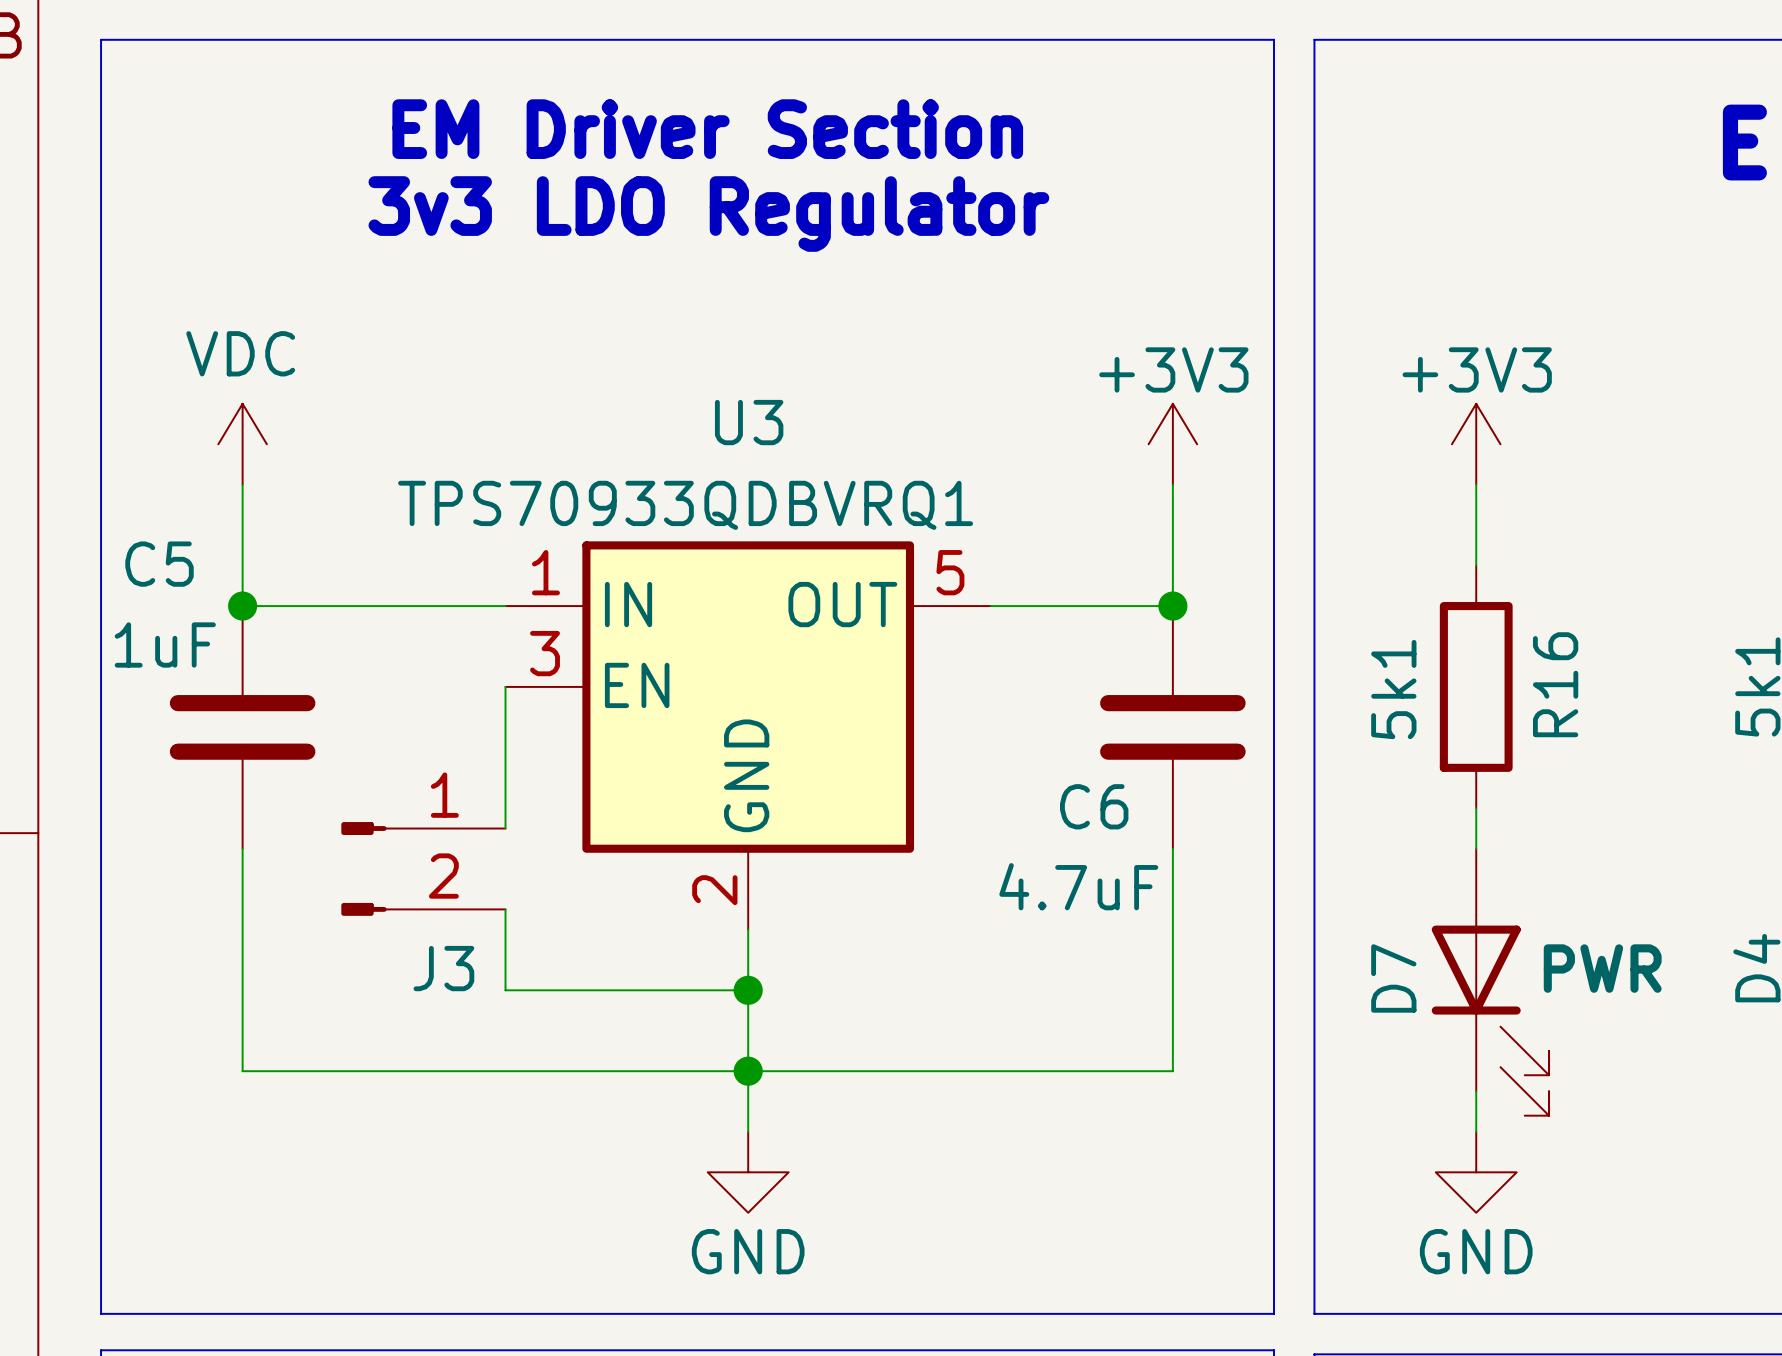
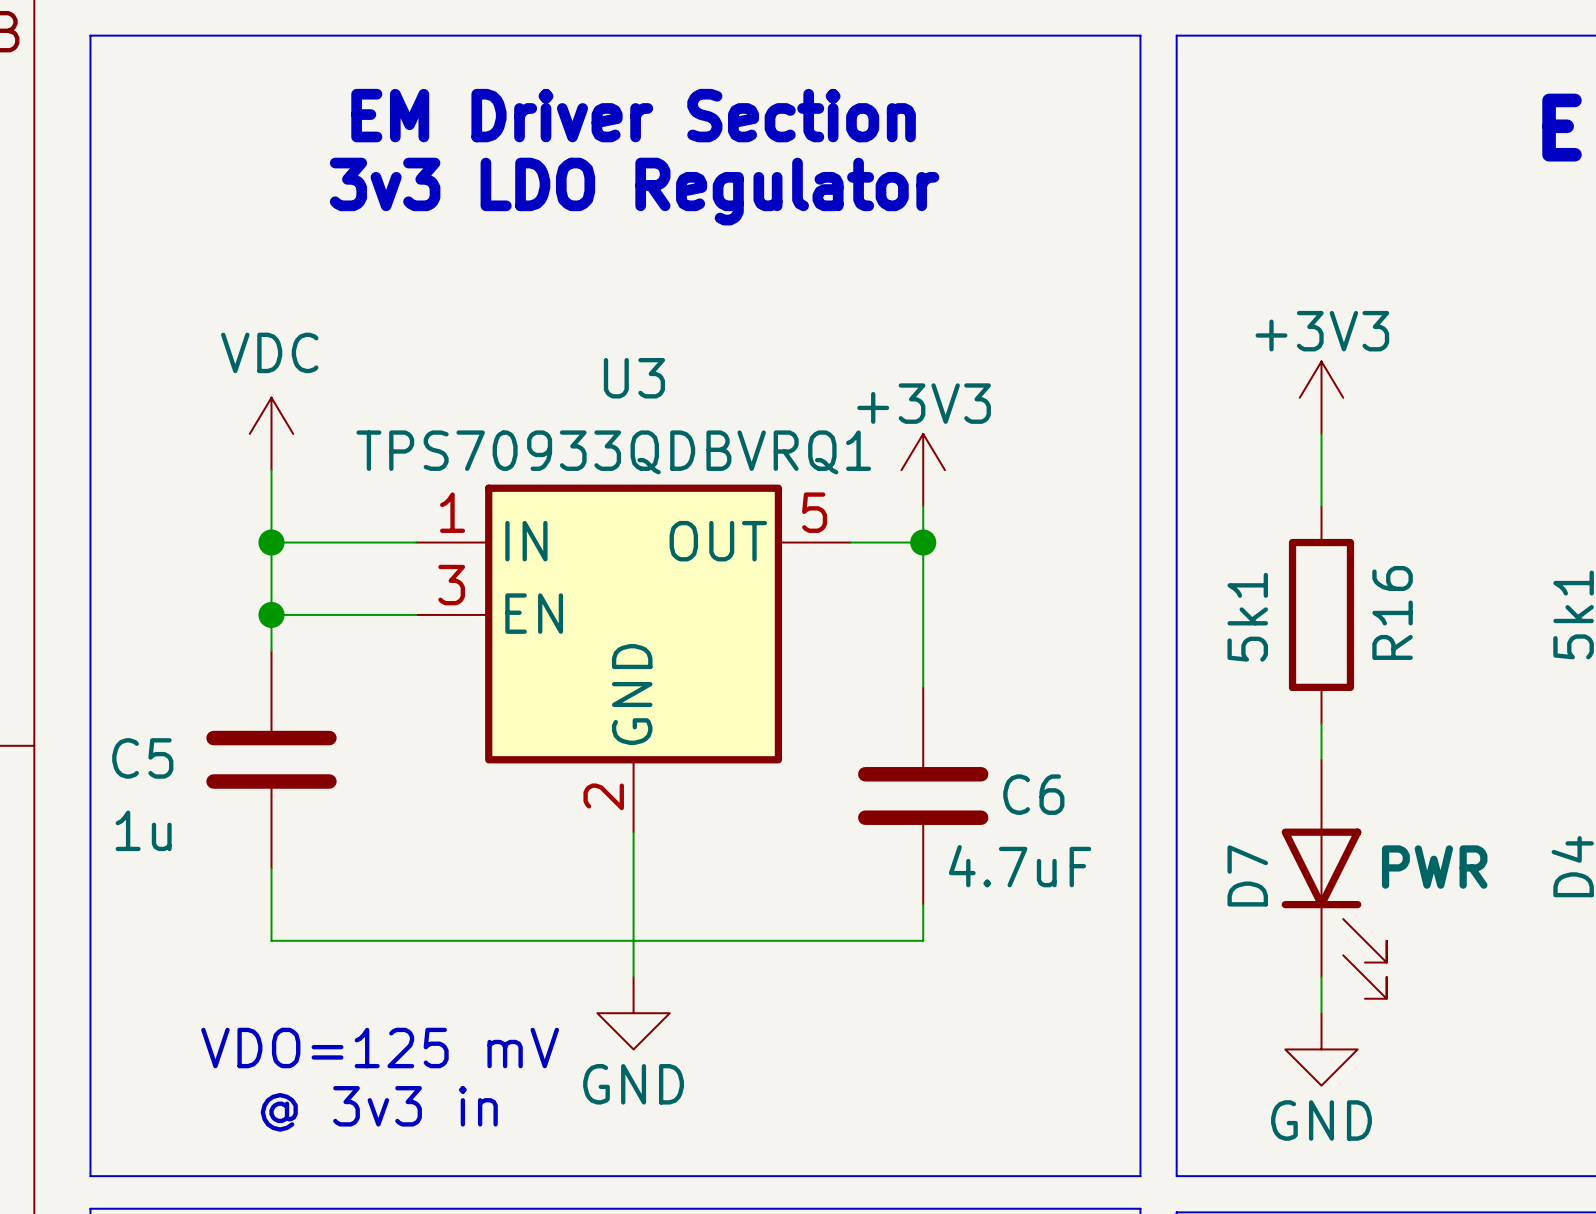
power symbol position: VDC (242, 444) -> VDC (271, 433)
power symbol position: +3V3 (1172, 444) -> +3V3 (923, 470)
wire: (242, 484) (242, 606) (303, 606) -> none
wire: (1172, 484) (1172, 606) (1031, 606) -> none
wire: none -> (271, 470) (271, 651)
C5 name position: C5 (159, 564) -> C5 (142, 758)
junction: (242, 606) -> none
junction: none -> (271, 542)
junction position: (1172, 606) -> (923, 542)
C5 value: 1uF (165, 644) -> 1u (143, 830)
wire: none -> (271, 614) (416, 614)
junction: none -> (271, 614)
wire: (505, 686) (505, 828) -> none
C5 position: (242, 727) -> (271, 759)
C6 position: (1172, 727) -> (923, 795)
U3 position: (748, 735) -> (633, 658)
C6 name position: C6 (1094, 806) -> C6 (1033, 794)
wire: (242, 848) (242, 1071) (1172, 1071) (1172, 848) -> none
J3: (423, 868) -> none
C6 value position: 4.7uF (1078, 886) -> 4.7uF (1020, 866)
wire: (505, 909) (505, 990) (748, 990) -> none
wire: none -> (633, 832) (633, 977)
wire: (748, 929) (748, 1131) -> (923, 506) (923, 687)
wire: none -> (271, 868) (271, 940) (923, 940) (923, 904)
junction: (748, 990) -> none
junction: (748, 1071) -> none
text: none -> VDO=125 mV (380, 1048)
power symbol position: GND (748, 1172) -> GND (633, 1013)
text: none -> @ 3v3 in (379, 1108)

